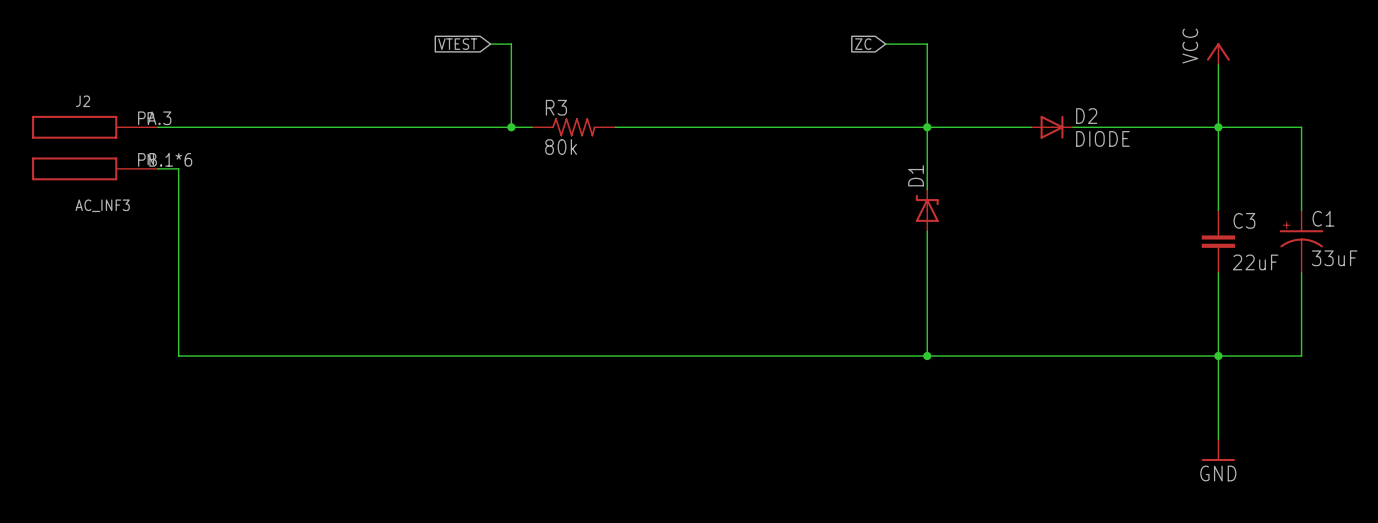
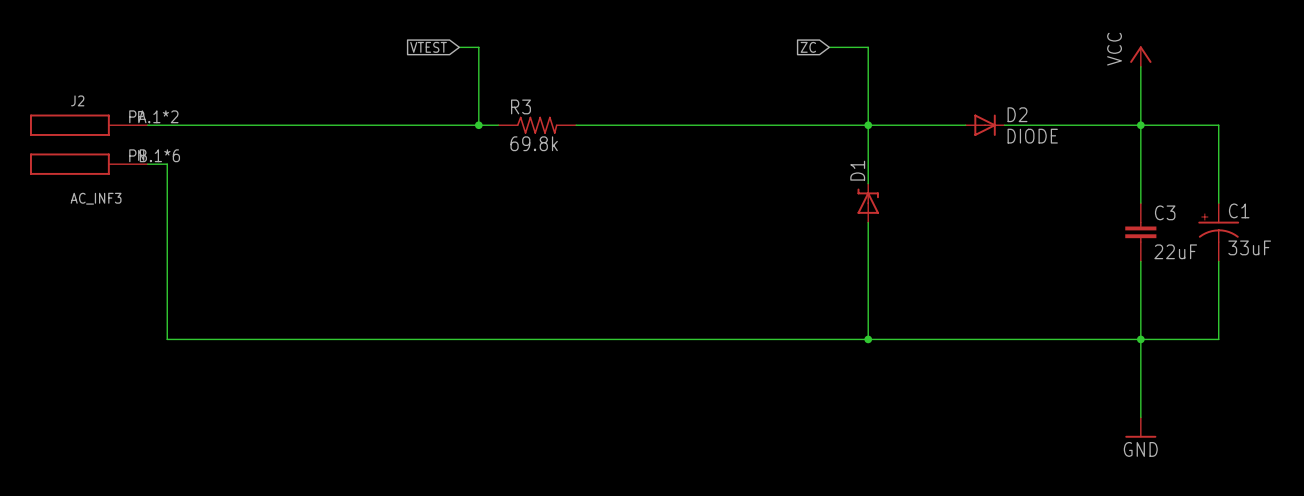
J2 pin number: PA.3 (154, 118) -> PA.1*2 (153, 116)
R3 value: 80k (561, 147) -> 69.8k (534, 143)

